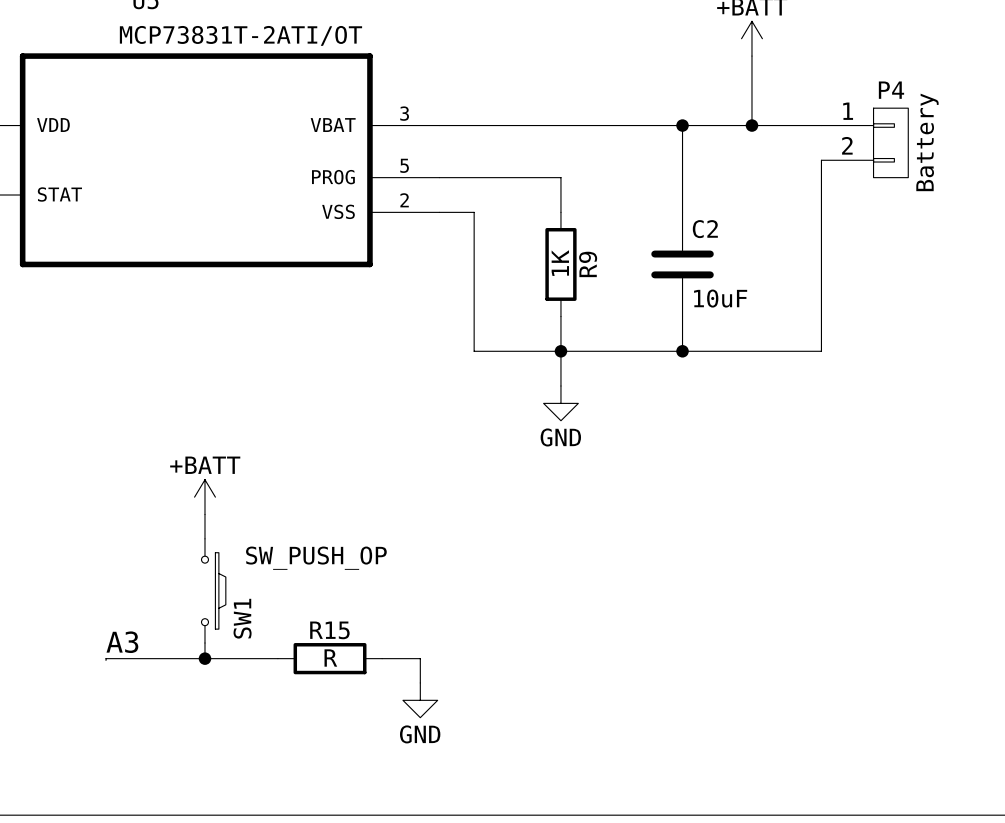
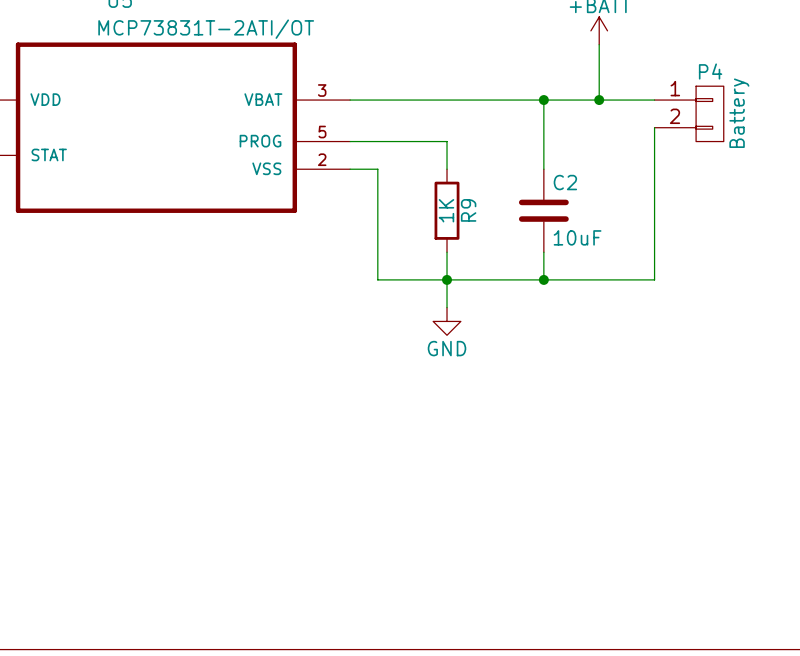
power symbol: +BATT (204, 497) -> none
wire: (204, 514) (204, 538) -> none
SW1: SW_PUSH_OP (213, 590) -> none
label: A3 (122, 642) -> none
wire: (204, 643) (204, 658) -> none
junction: (204, 658) -> none
wire: (277, 658) (106, 658) (106, 660) -> none
R15: R (330, 658) -> none
wire: (382, 658) (420, 658) (420, 682) -> none
power symbol: GND (420, 700) -> none

